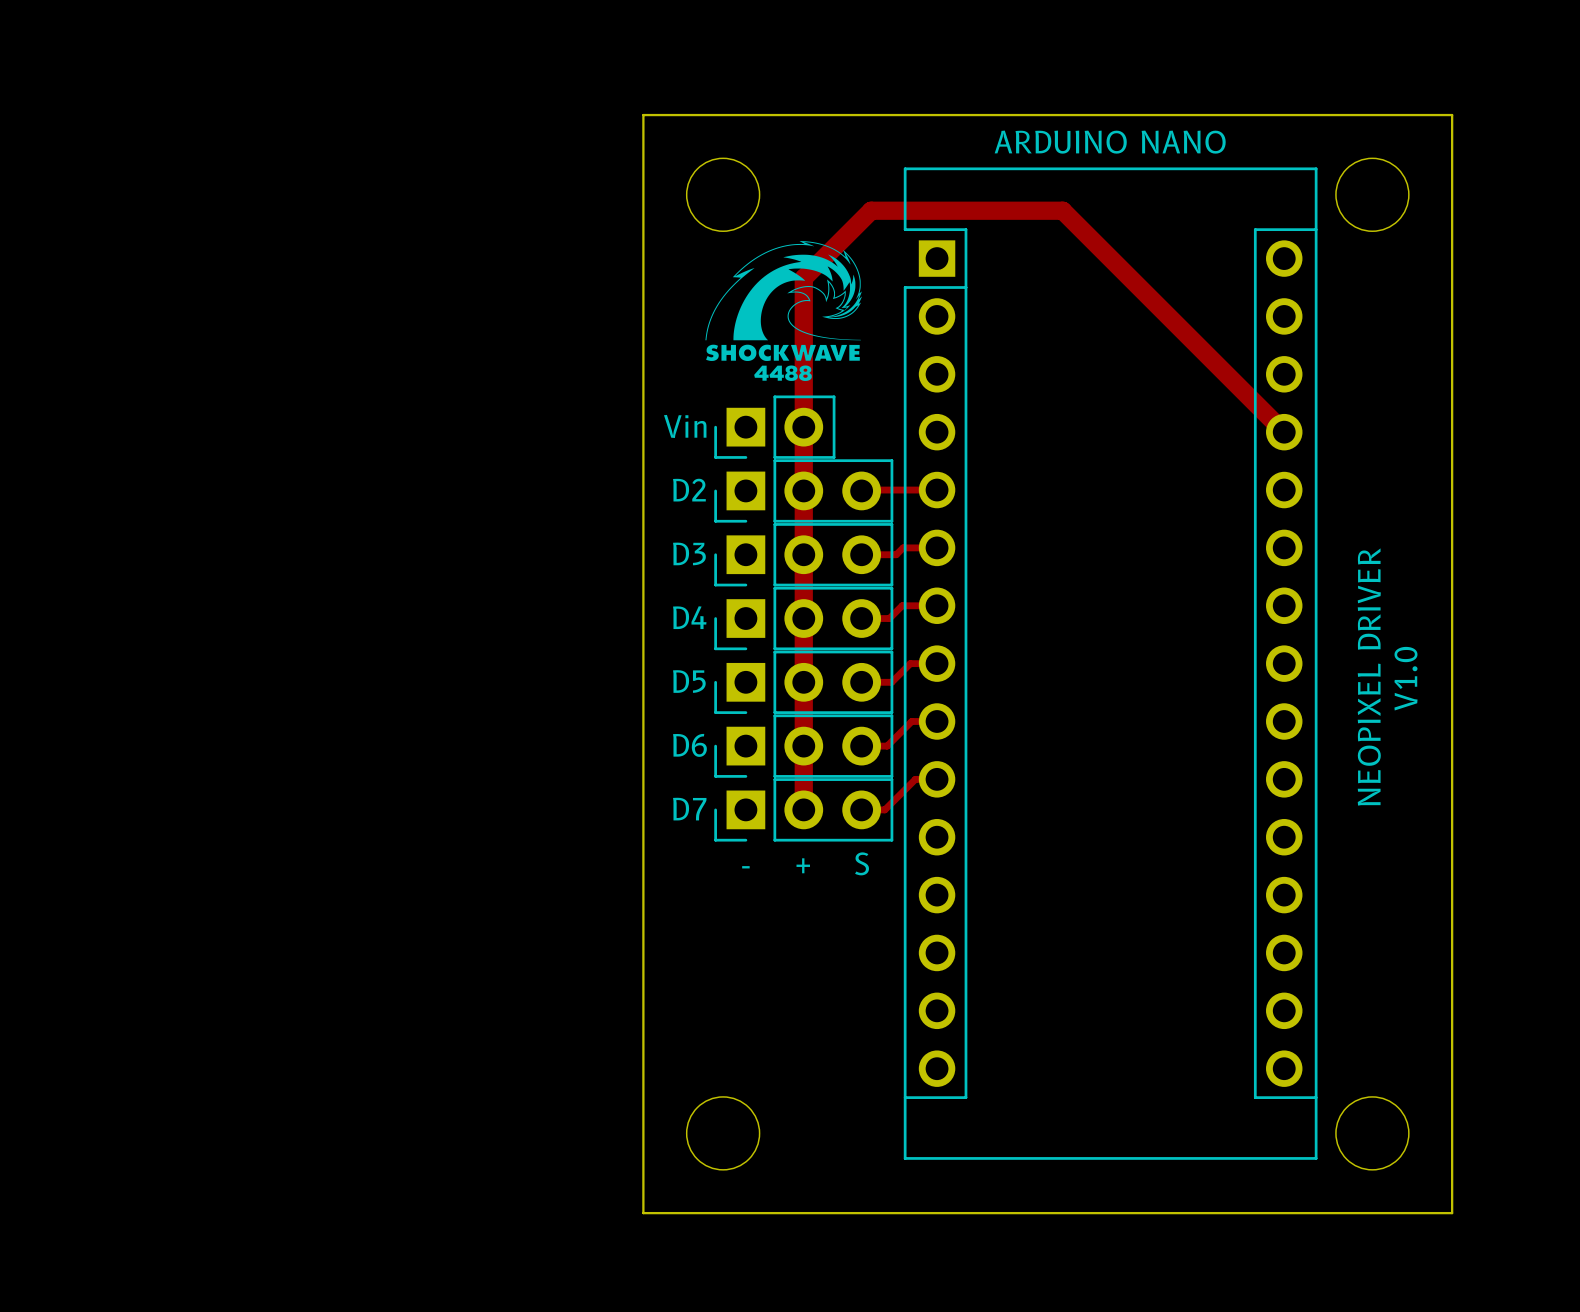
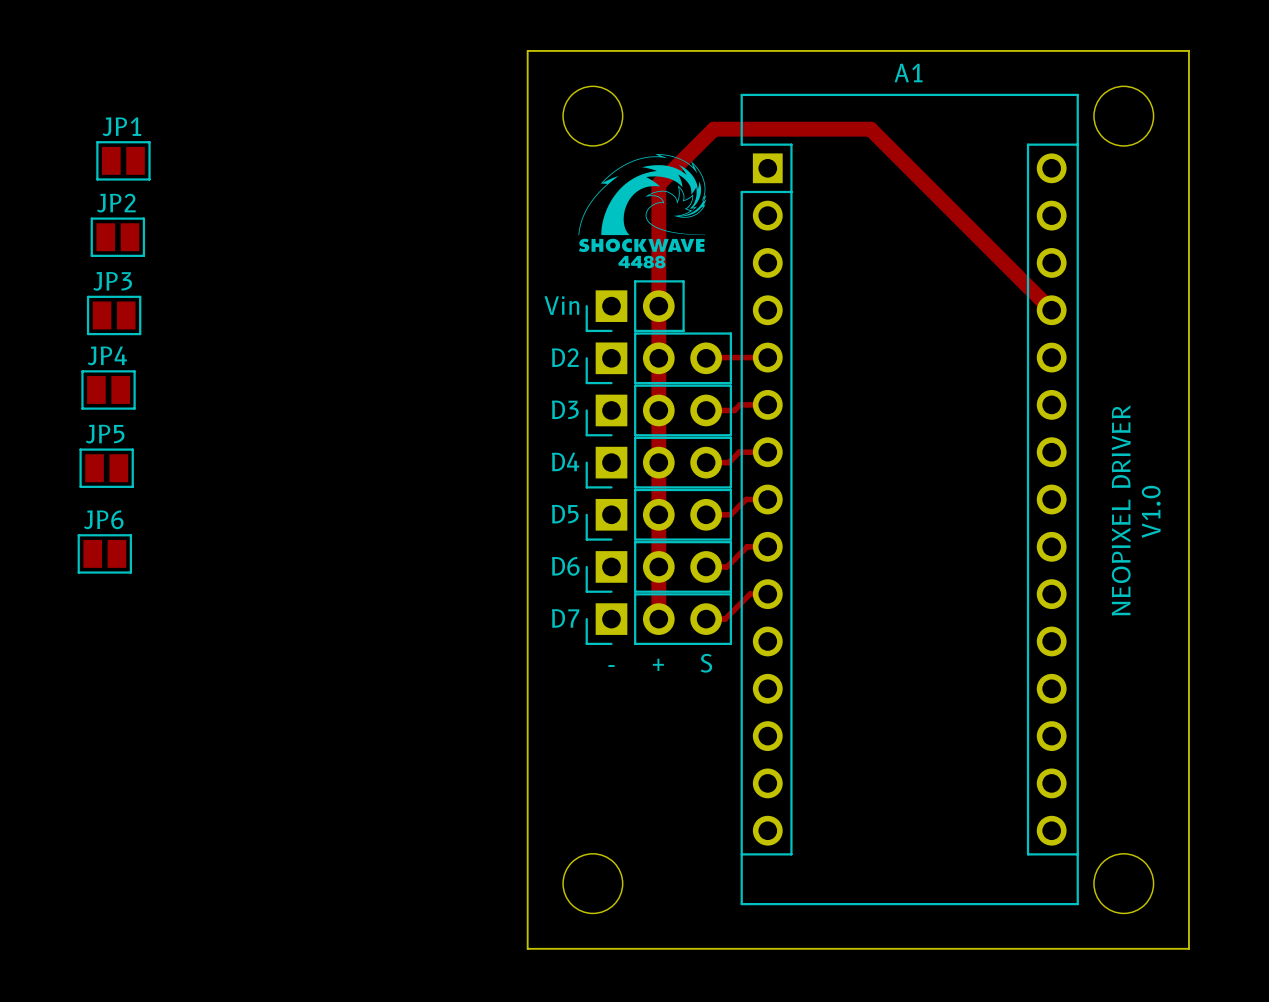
ARDUINO NANO name: ARDUINO NANO (1110, 142) -> A1 (908, 72)
JP1: none -> (123, 160)
JP2: none -> (117, 237)
JP3: none -> (114, 315)
JP4: none -> (108, 389)
JP5: none -> (106, 468)
JP6: none -> (104, 553)

